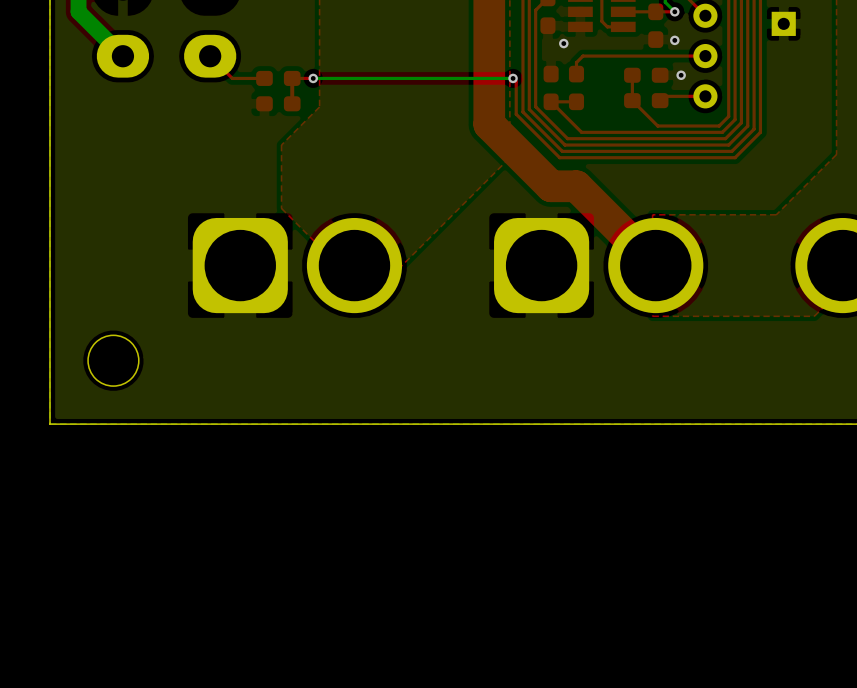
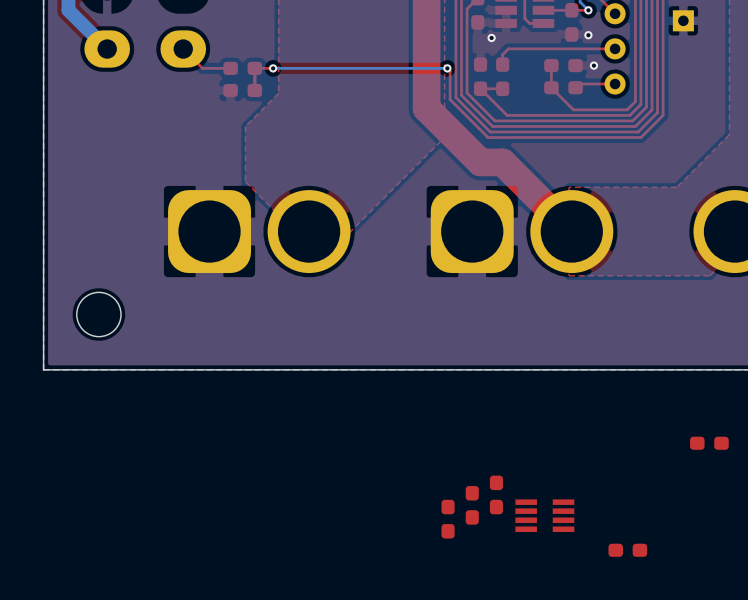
part: none -> (709, 443)
part: none -> (496, 494)
part: none -> (472, 505)
part: none -> (544, 515)
part: none -> (448, 519)
part: none -> (627, 550)

